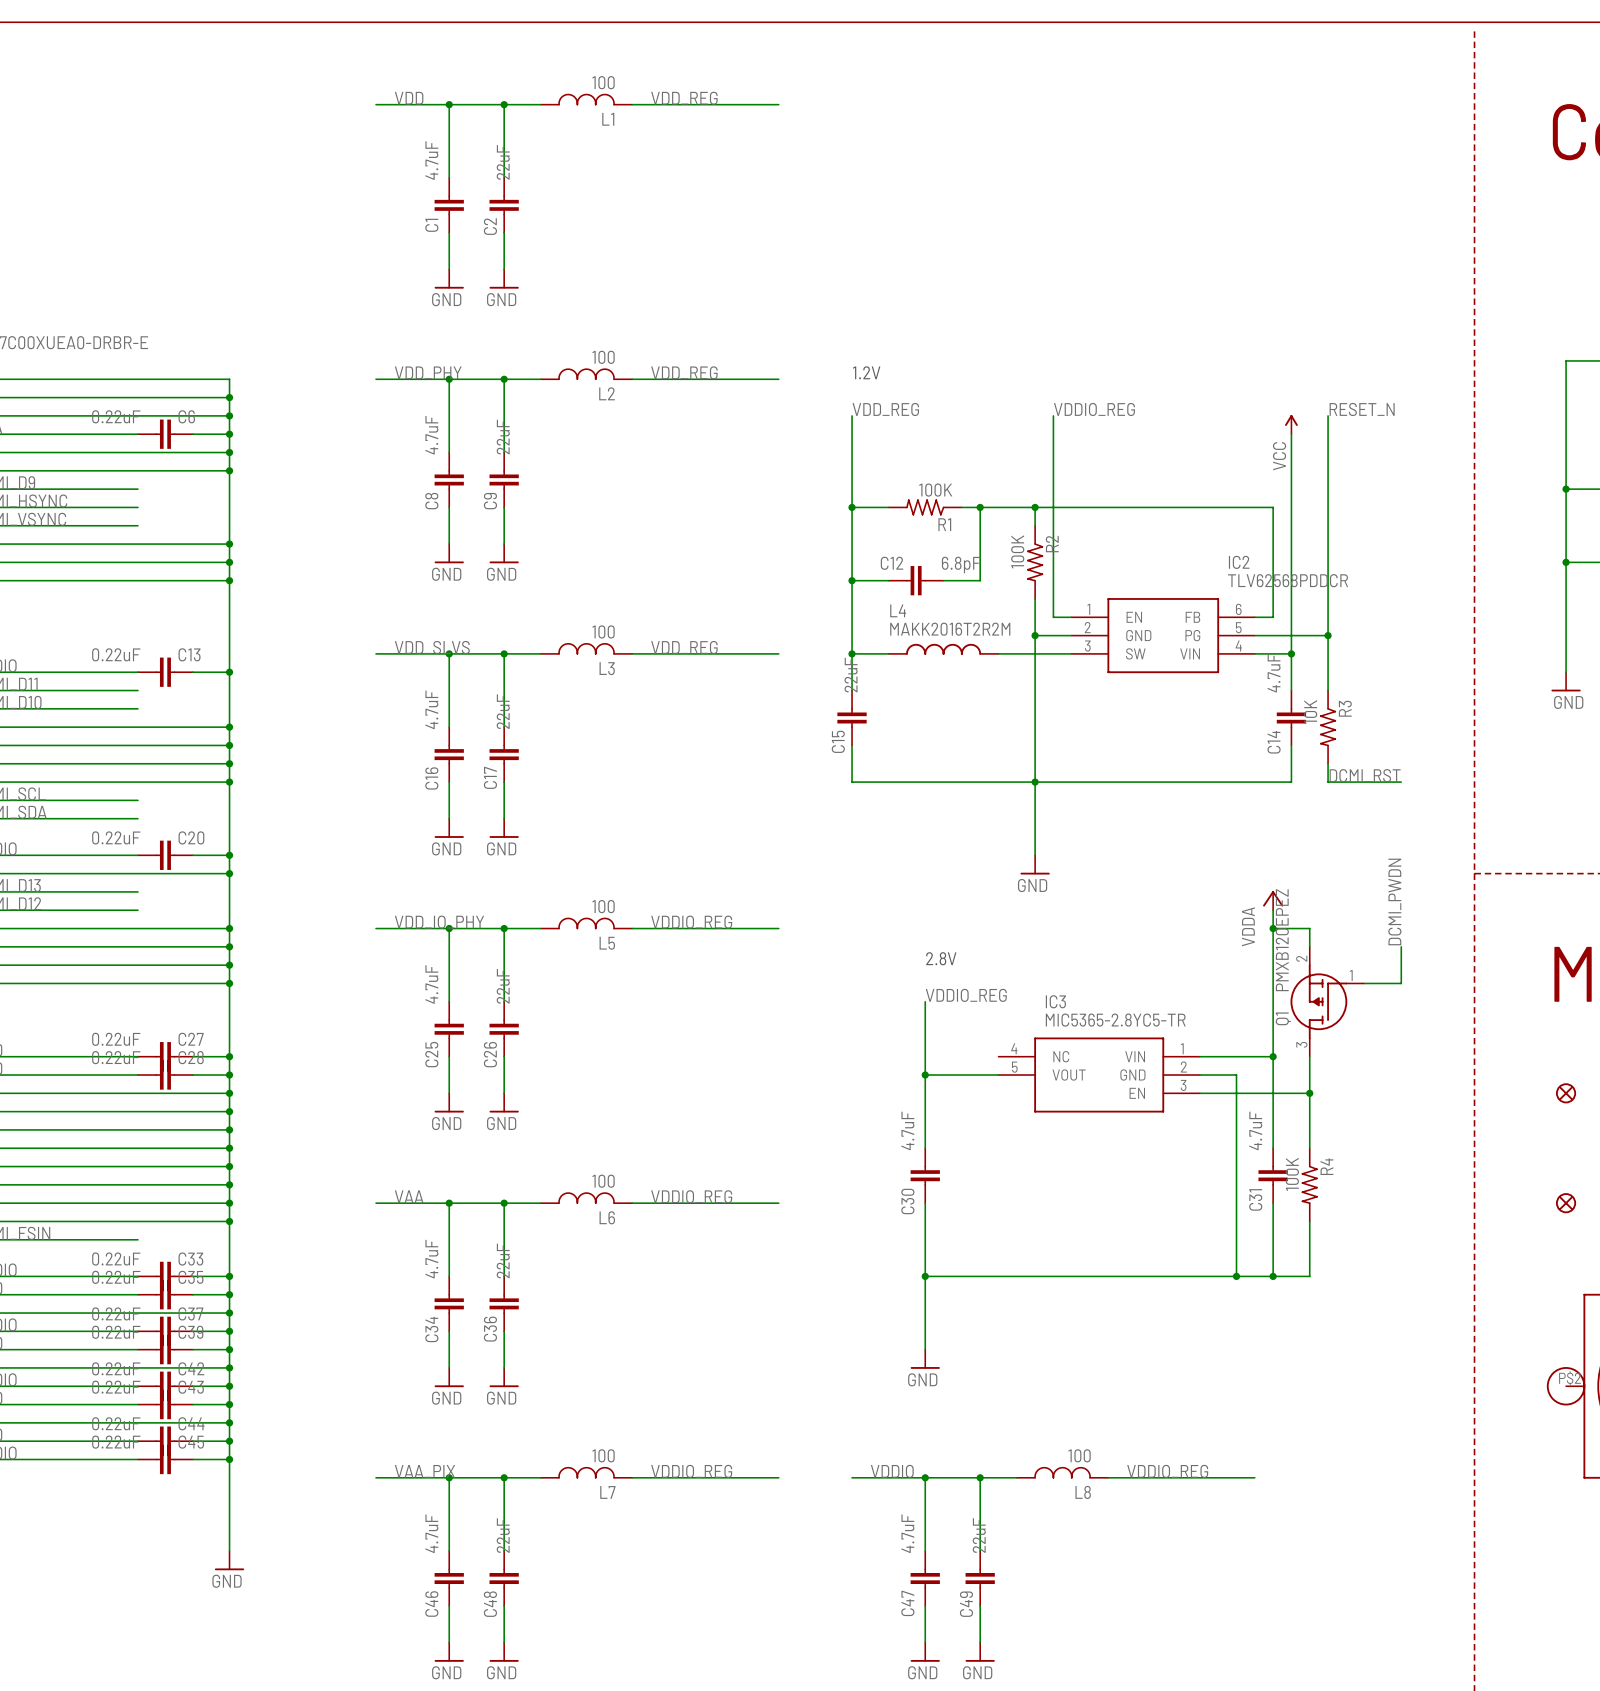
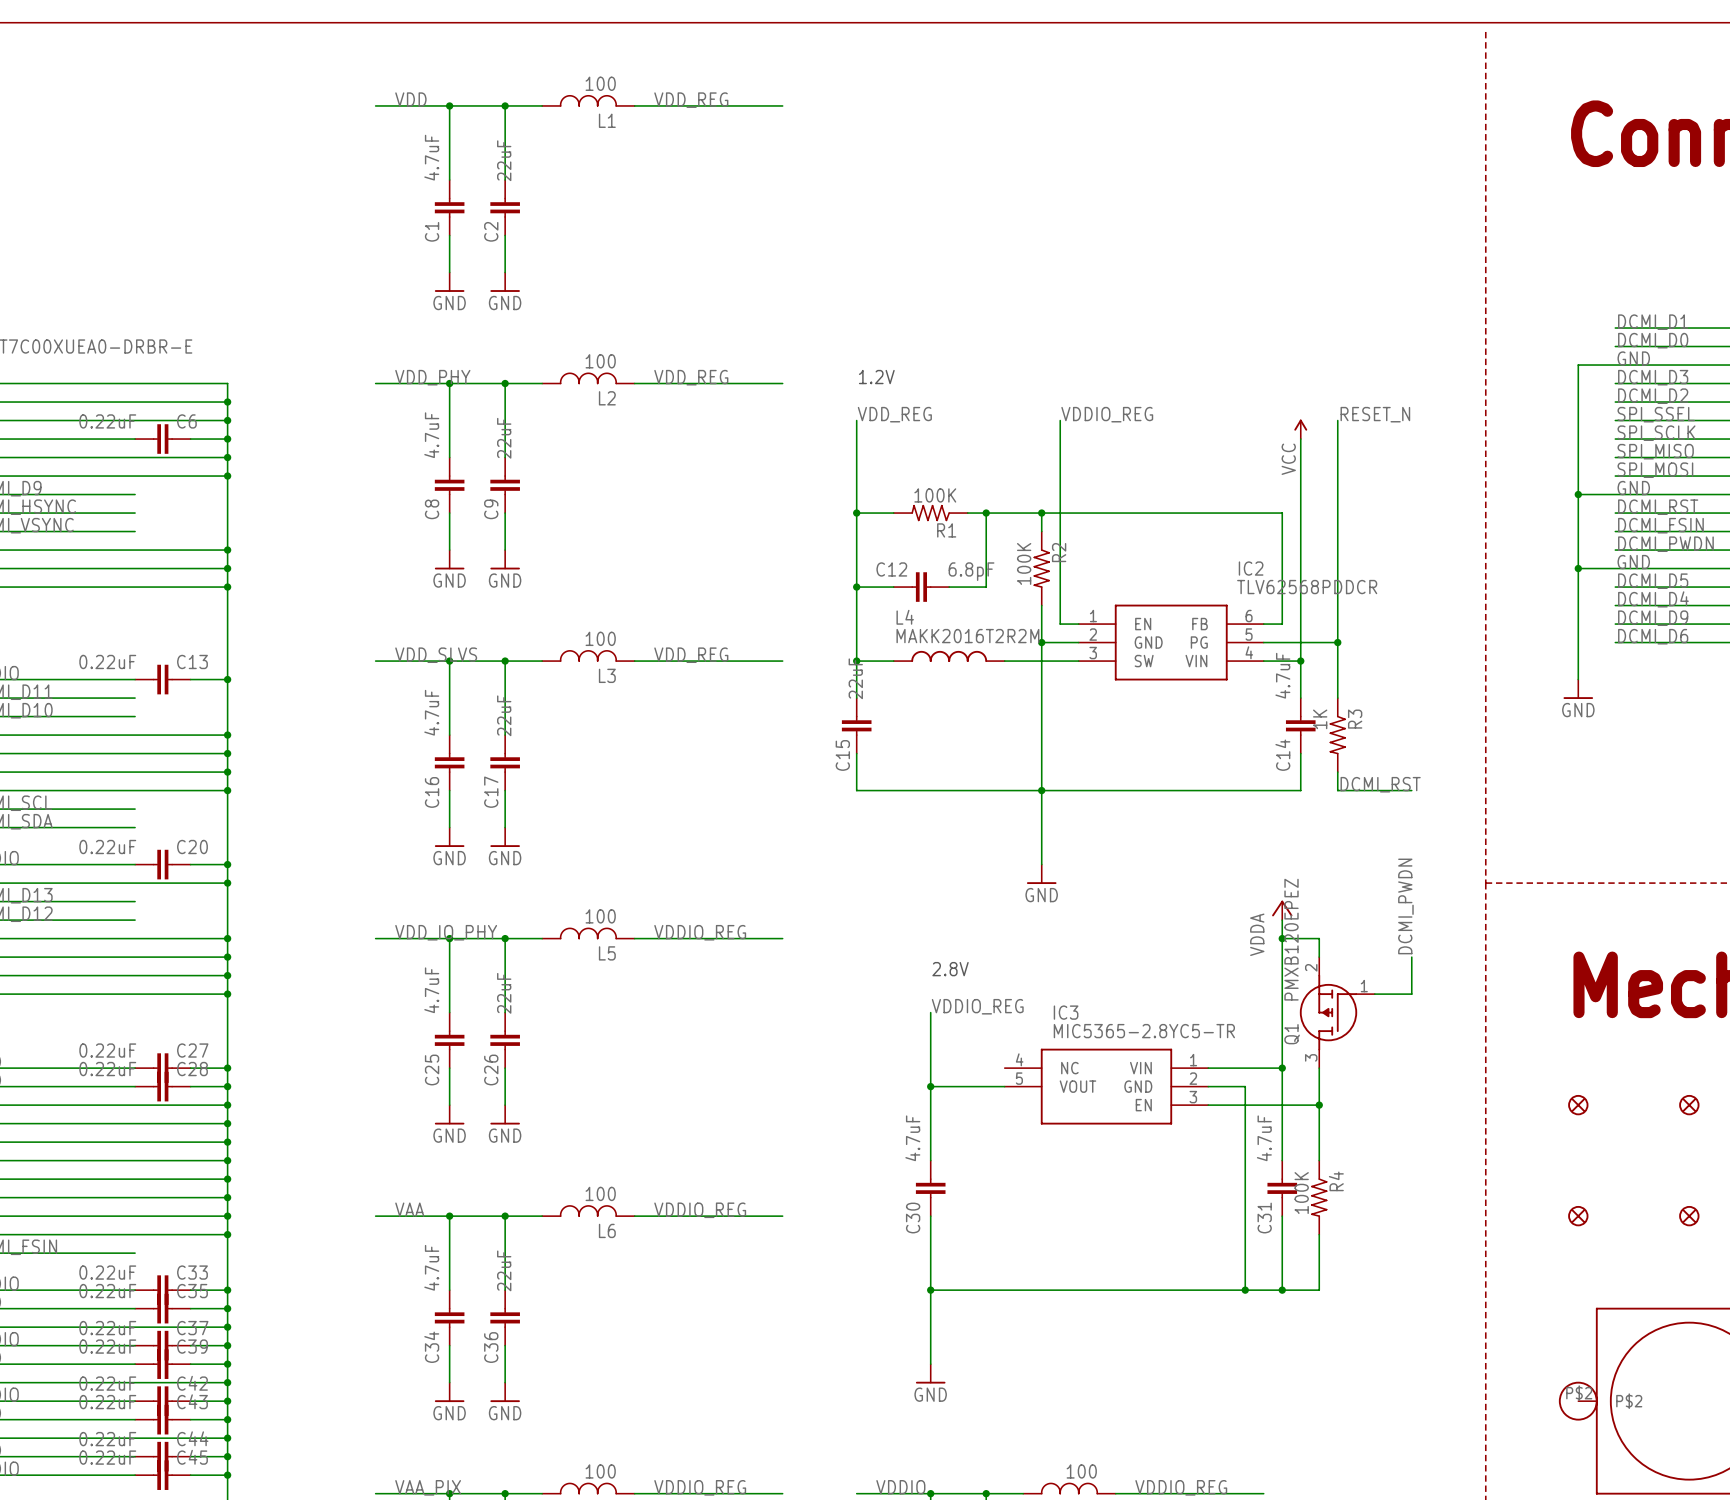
R3 value: 10K (1310, 712) -> 1K (1320, 719)

